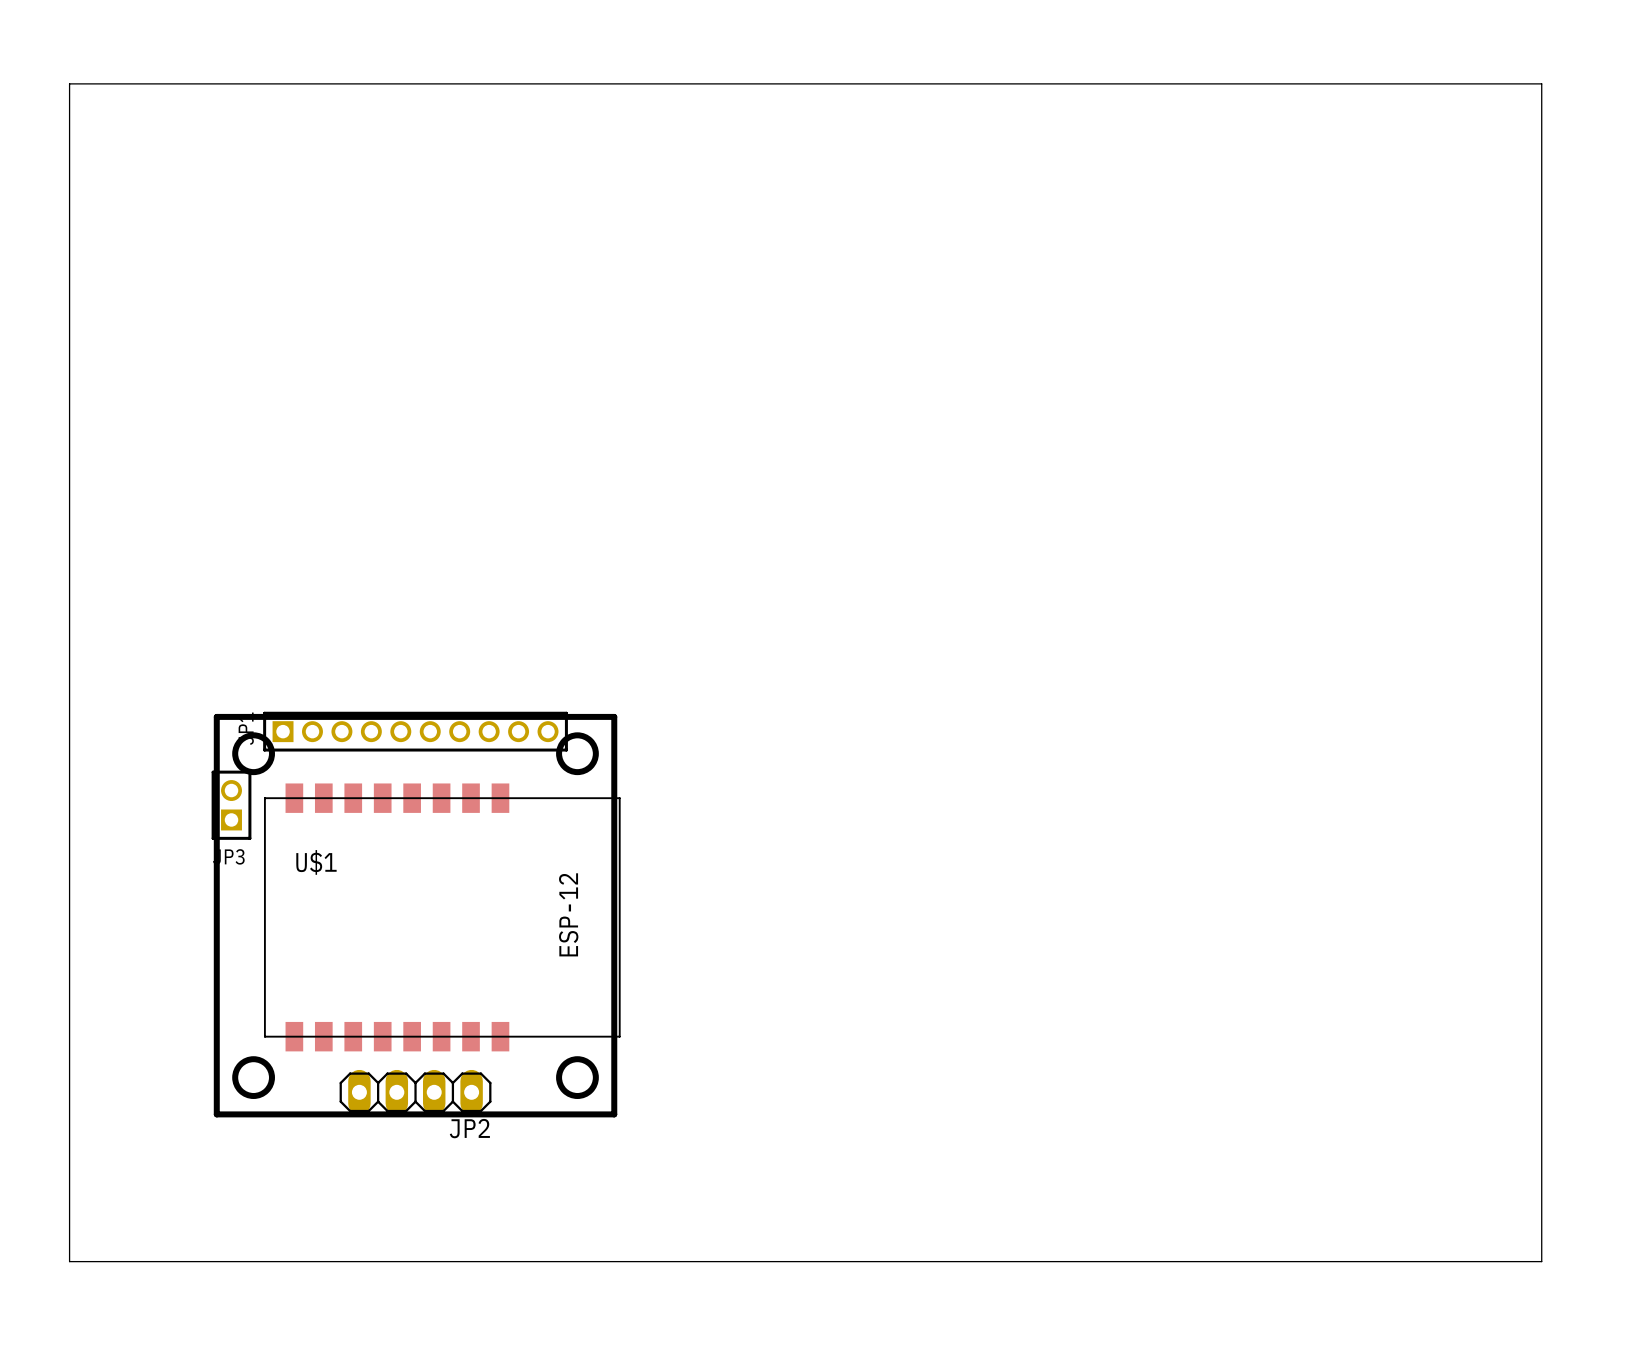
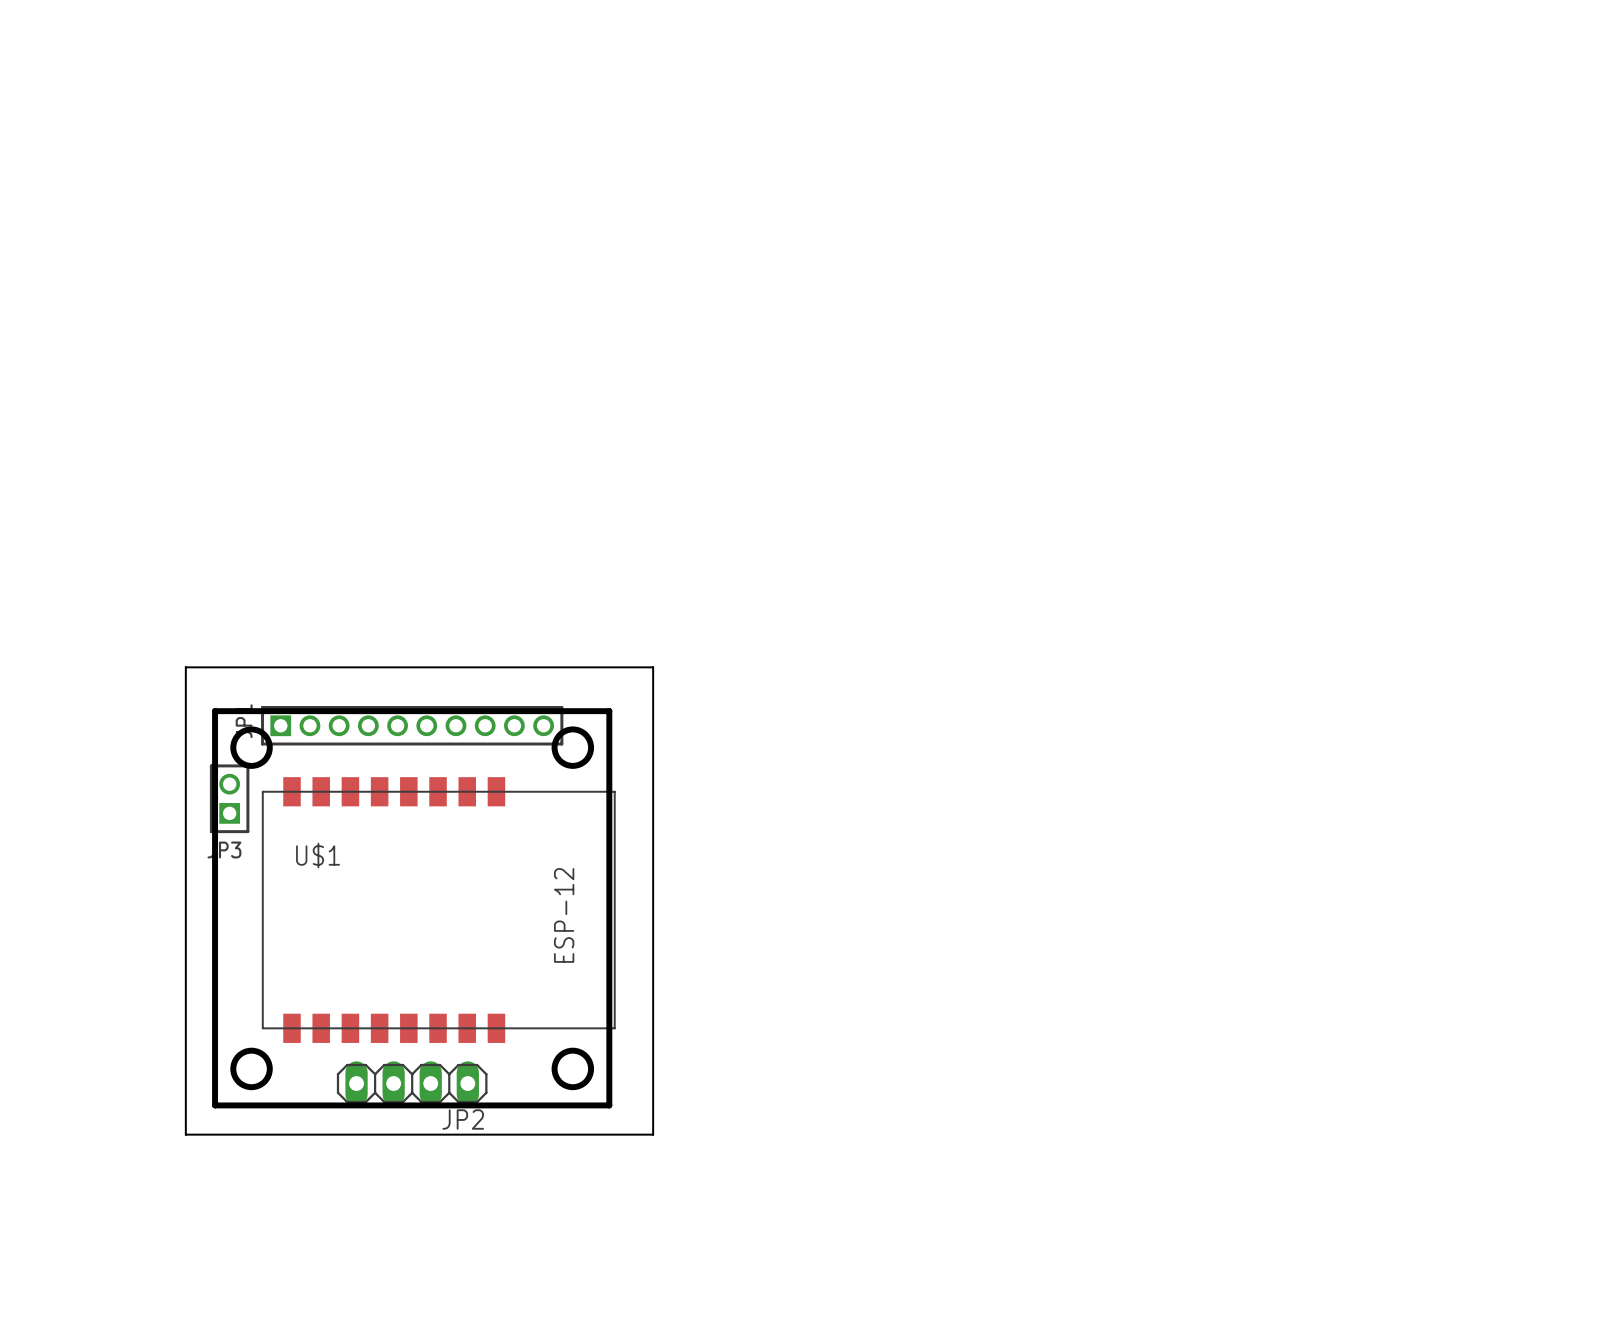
board edge: (69, 83) (1541, 83) (1541, 1261) (69, 1261) (69, 83) -> none
board edge: none -> (185, 667) (653, 667) (653, 1134) (185, 1134) (185, 667)

